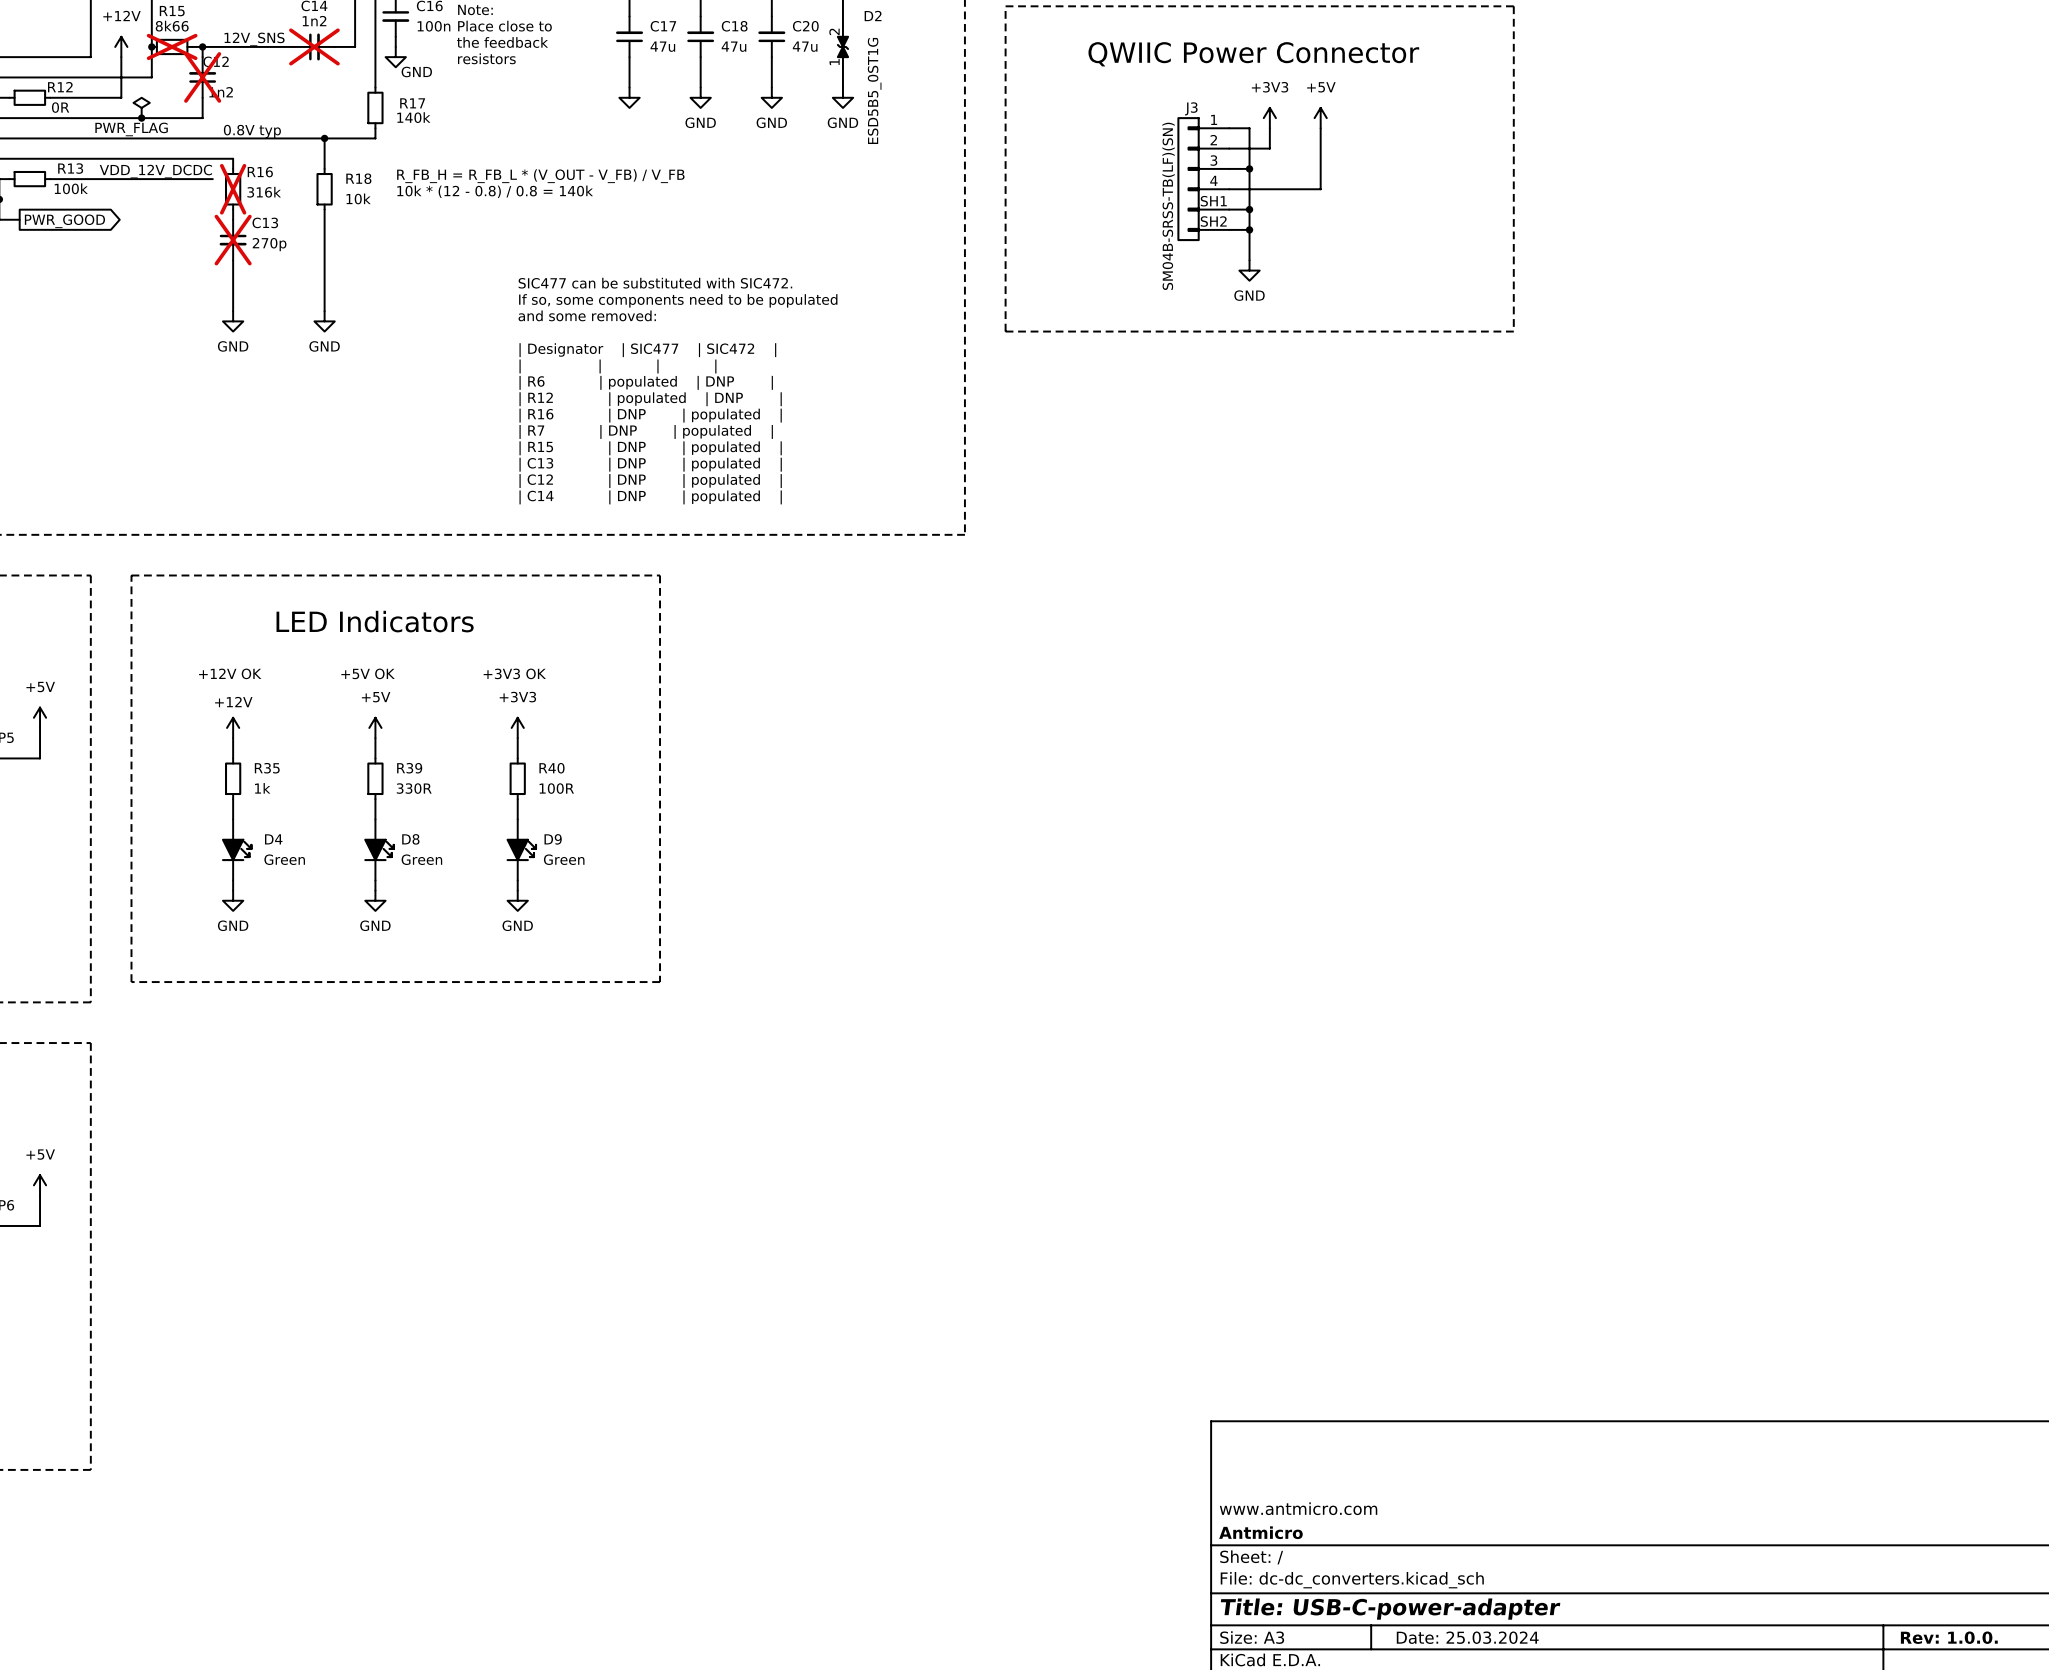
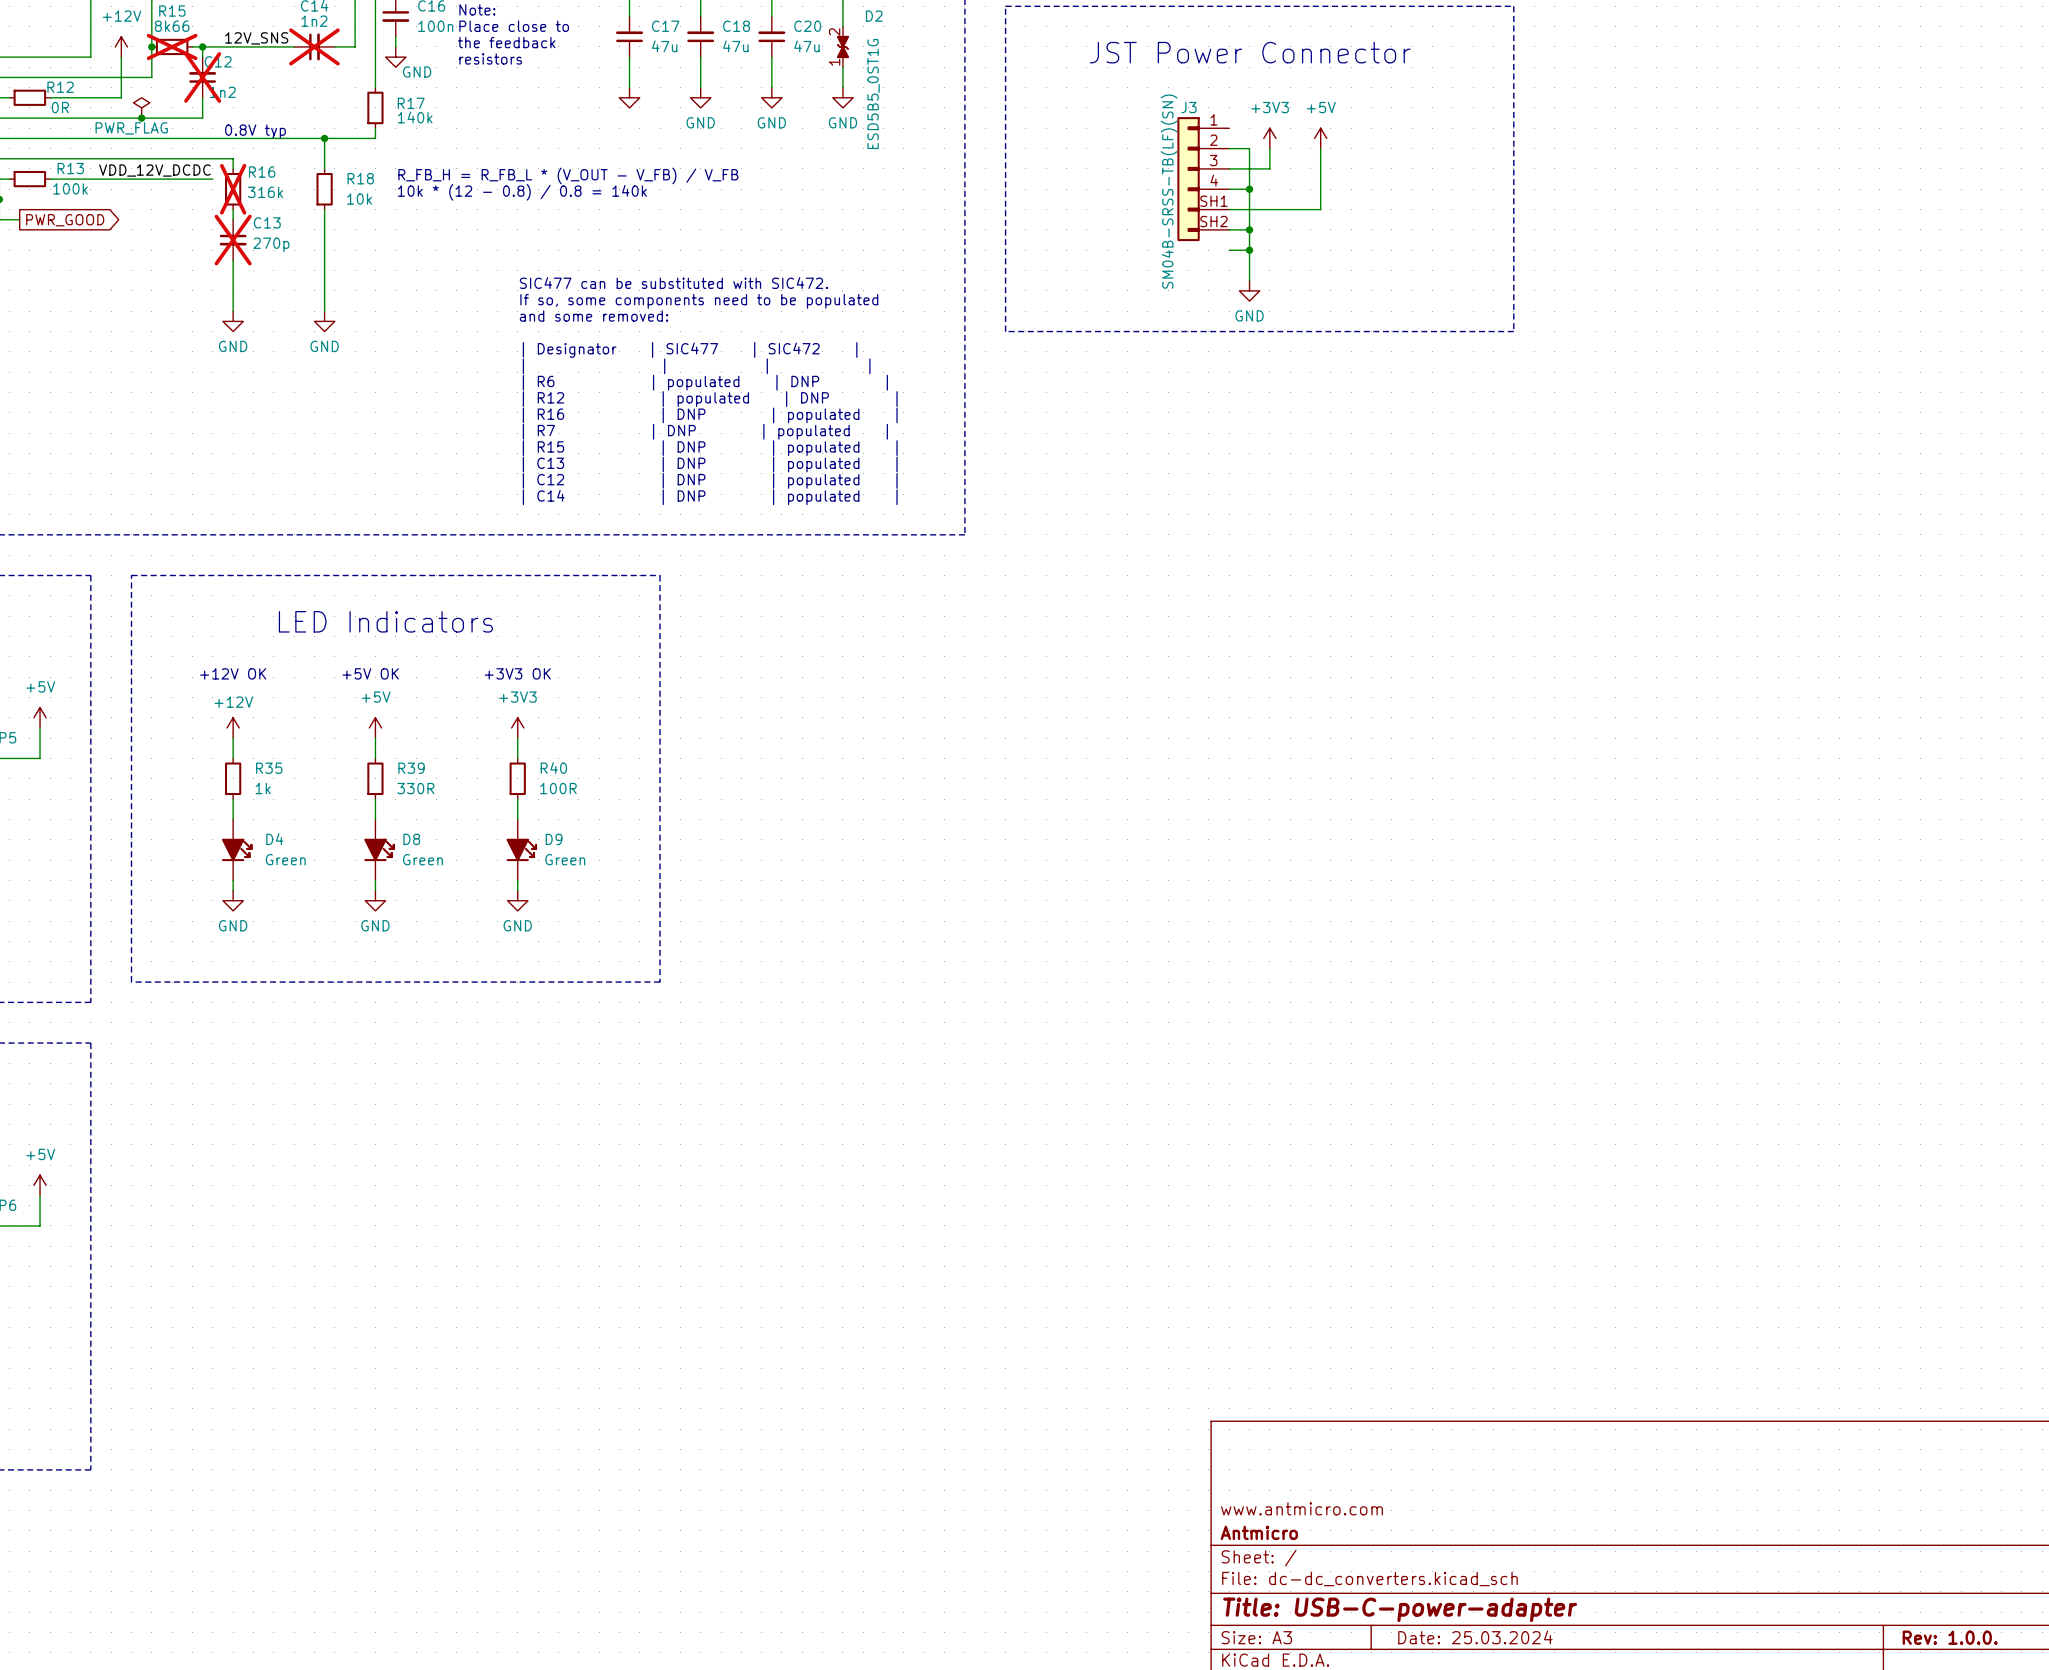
text: QWIIC Power Connector (1253, 54) -> JST Power Connector (1250, 52)
power symbol position: +3V3 (1269, 118) -> +3V3 (1269, 138)
power symbol position: +5V (1320, 118) -> +5V (1320, 138)
wire: (1229, 128) (1249, 128) (1249, 148) (1269, 148) (1269, 128) -> none
wire: none -> (1269, 148) (1269, 168) (1249, 168)
junction: (1249, 168) -> none
wire: (1249, 189) (1320, 189) -> (1249, 209) (1320, 209) (1320, 189)
junction: none -> (1249, 189)
junction: (1249, 209) -> none
wire: none -> (1229, 250) (1249, 250)
junction: none -> (1249, 250)
power symbol position: GND (1249, 270) -> GND (1249, 290)

